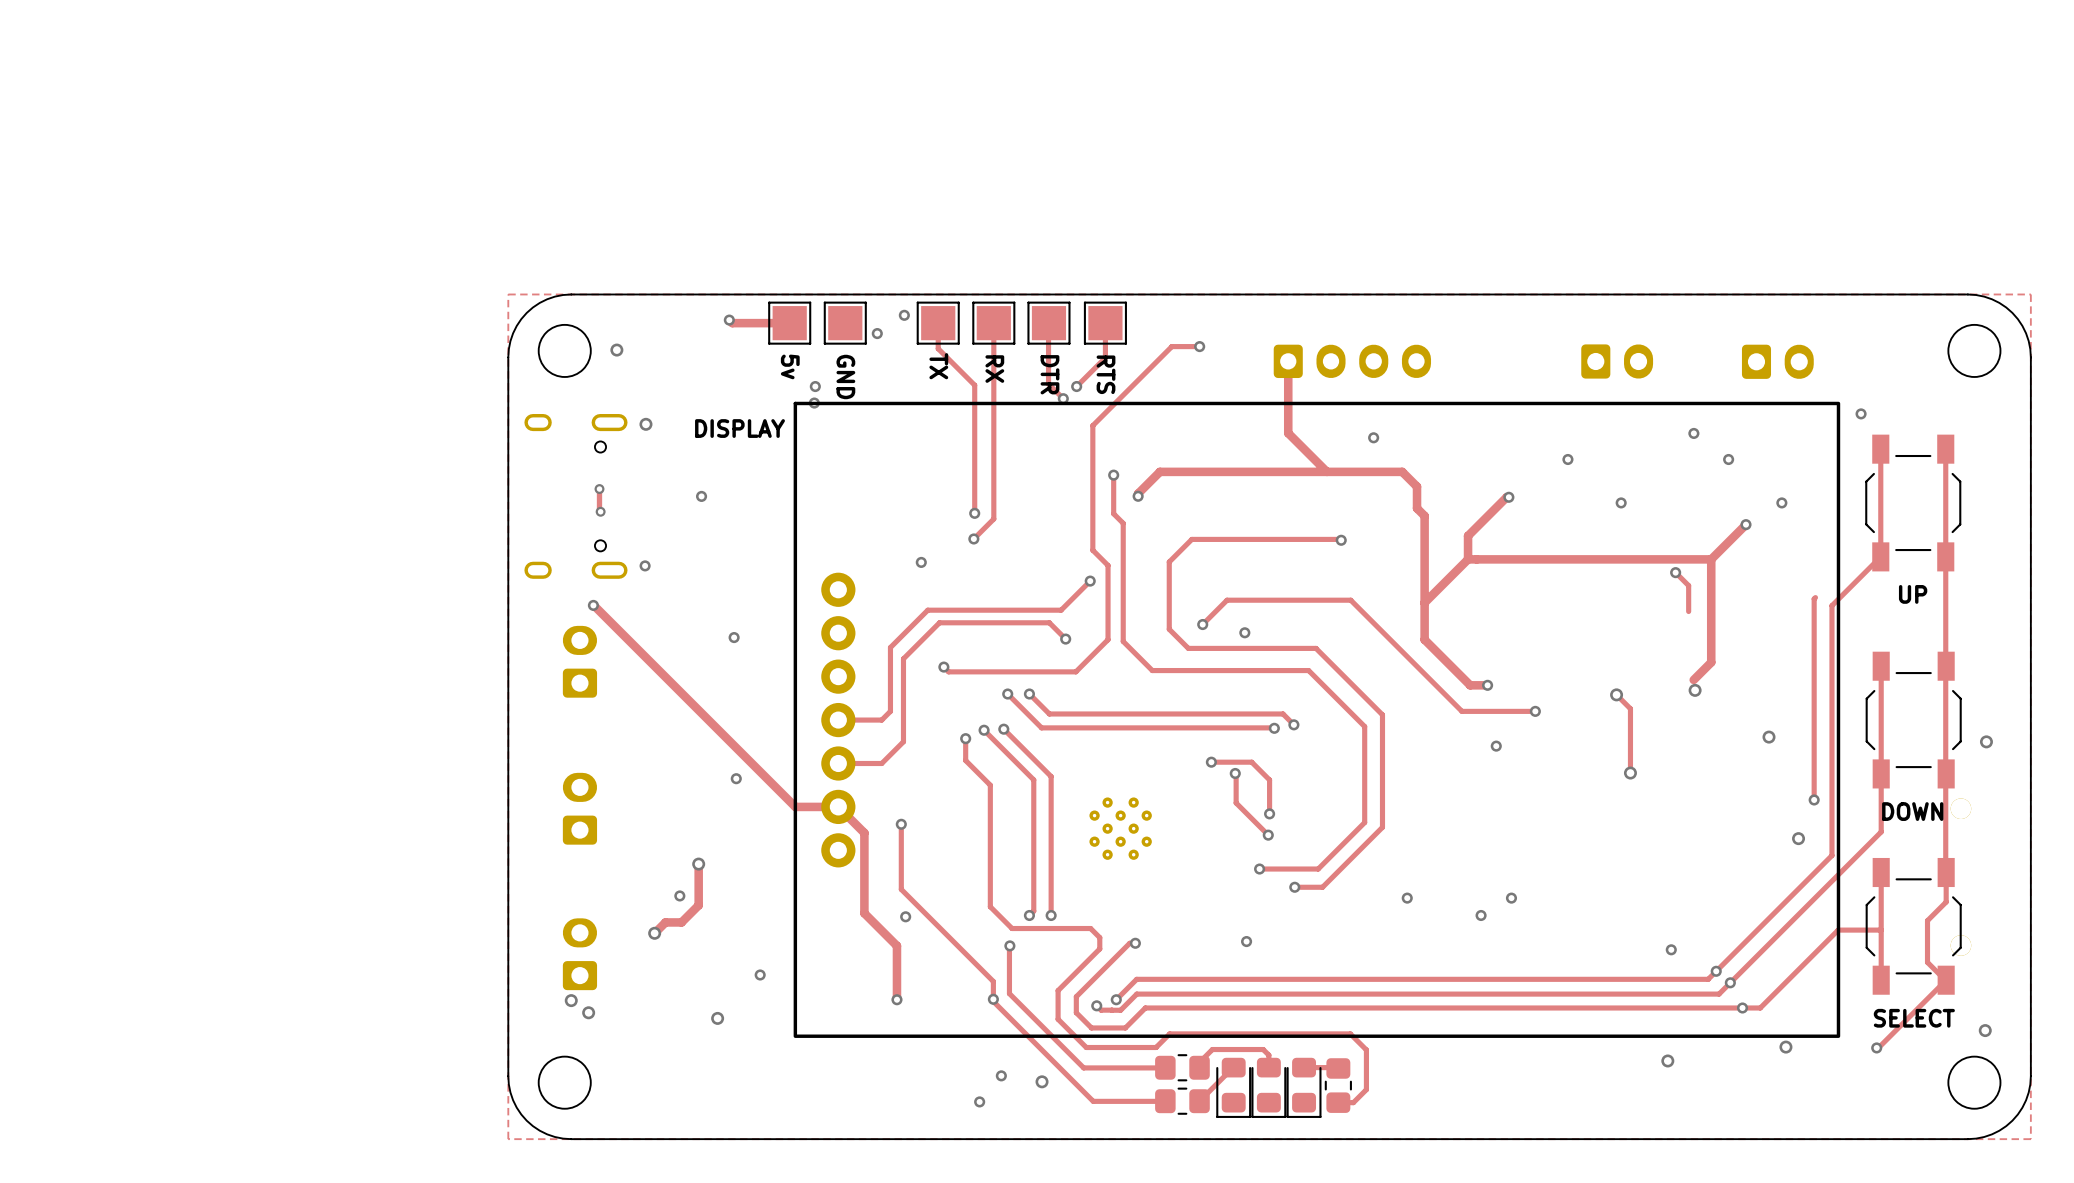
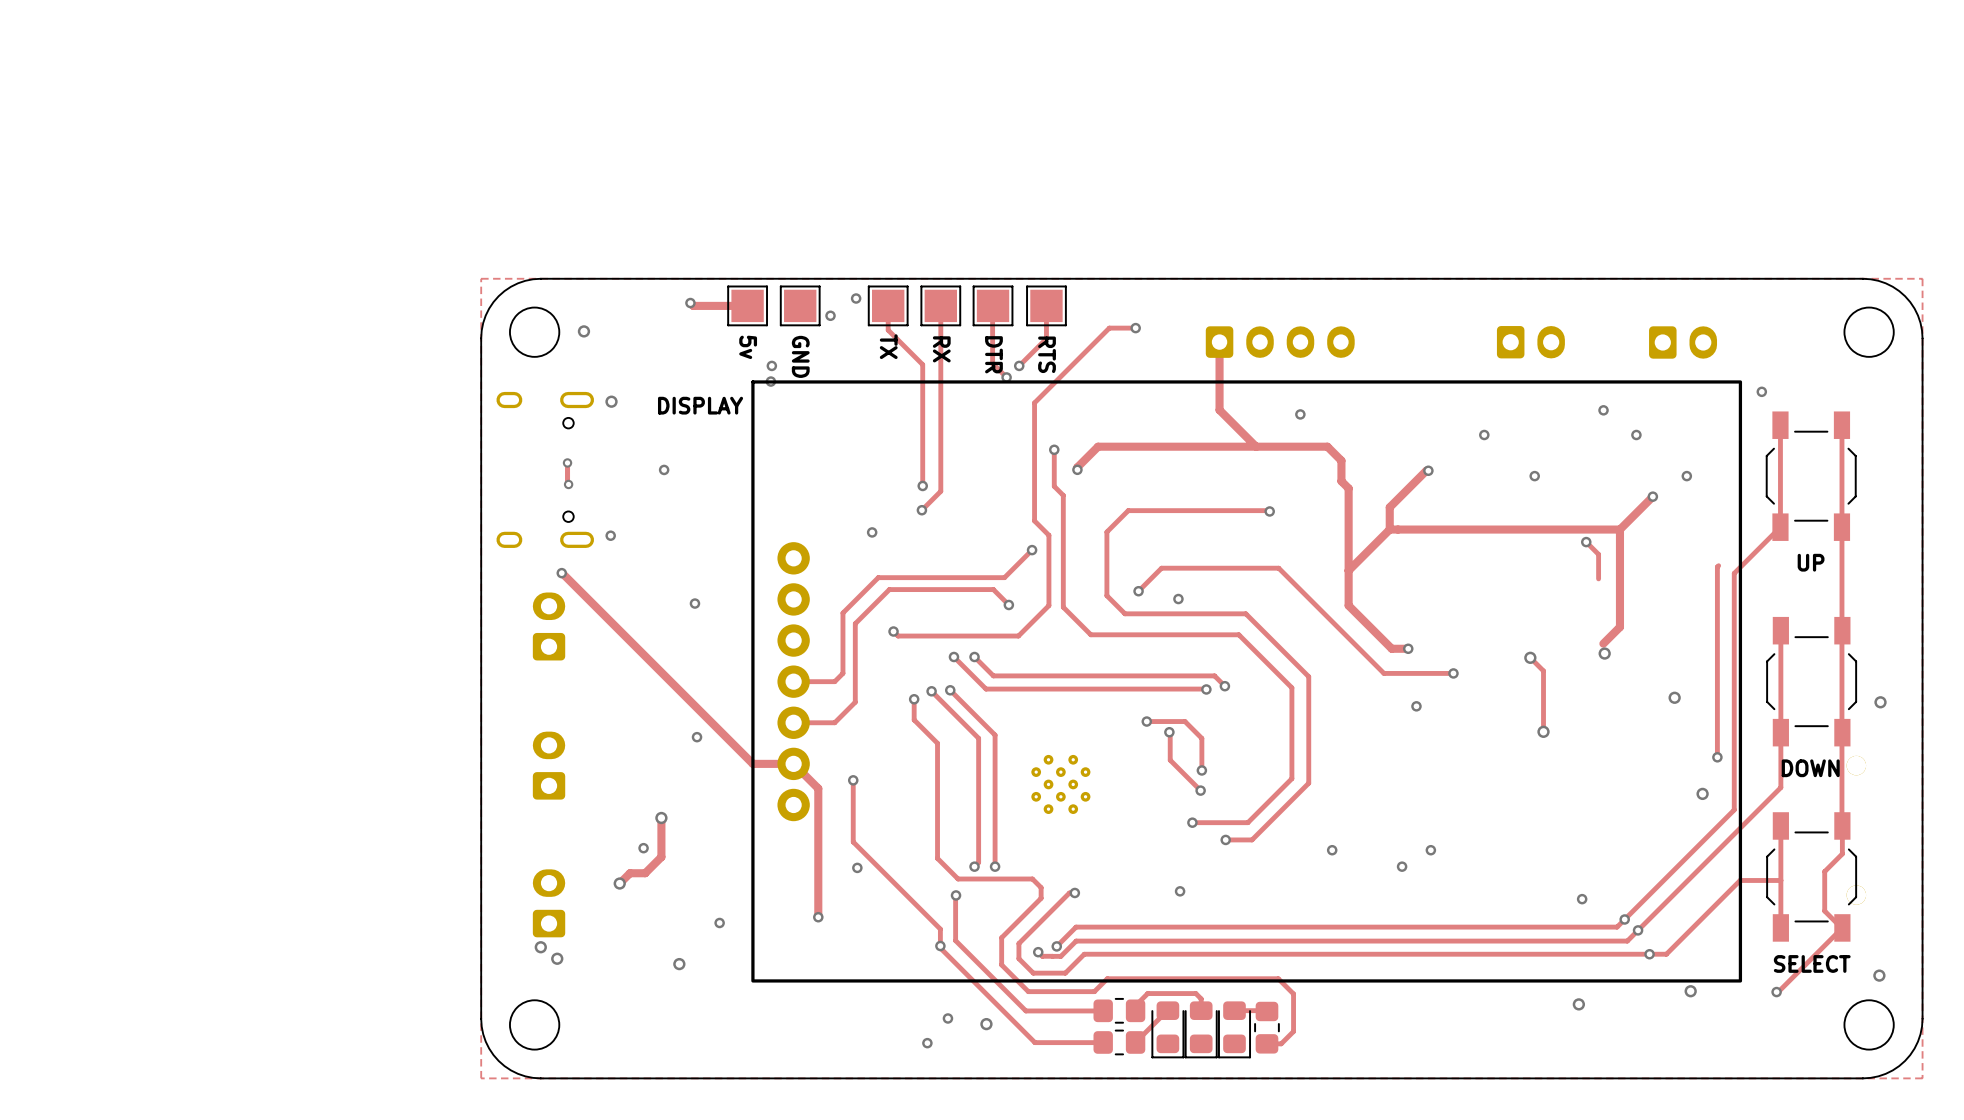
track: (864, 913) (896, 945) (896, 999) -> (818, 864) (818, 917)
via position: (896, 999) -> (818, 917)

